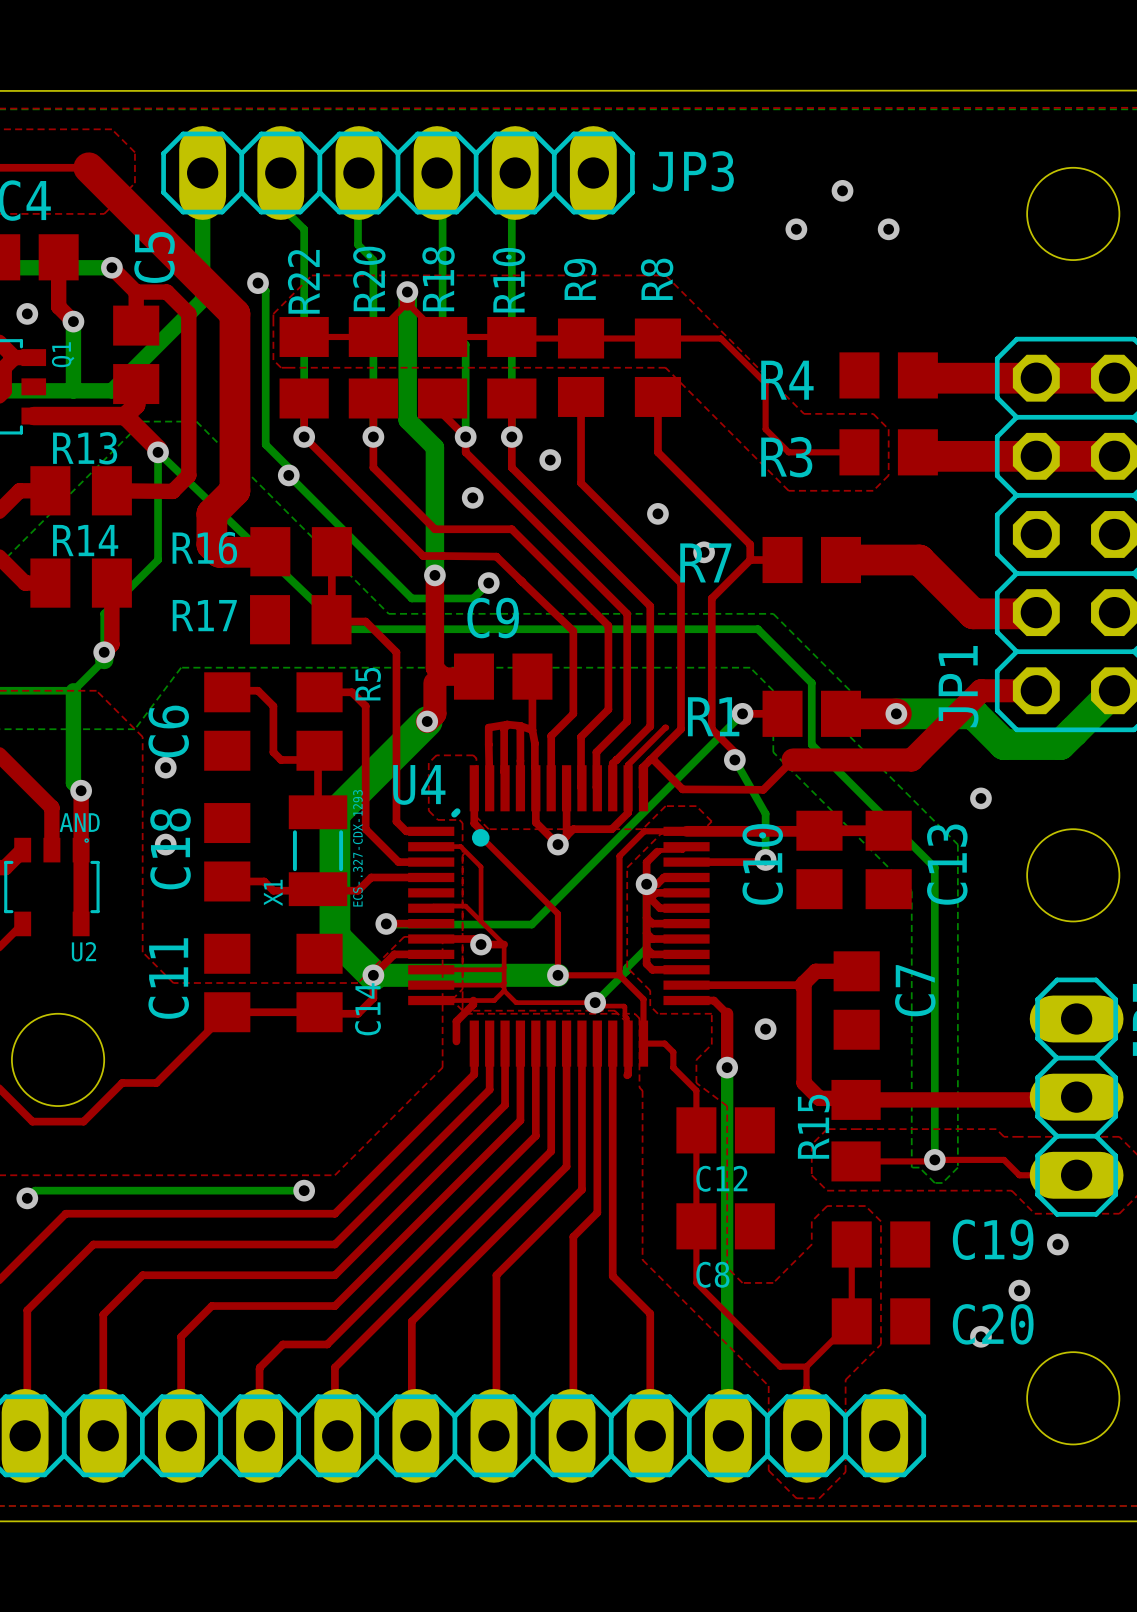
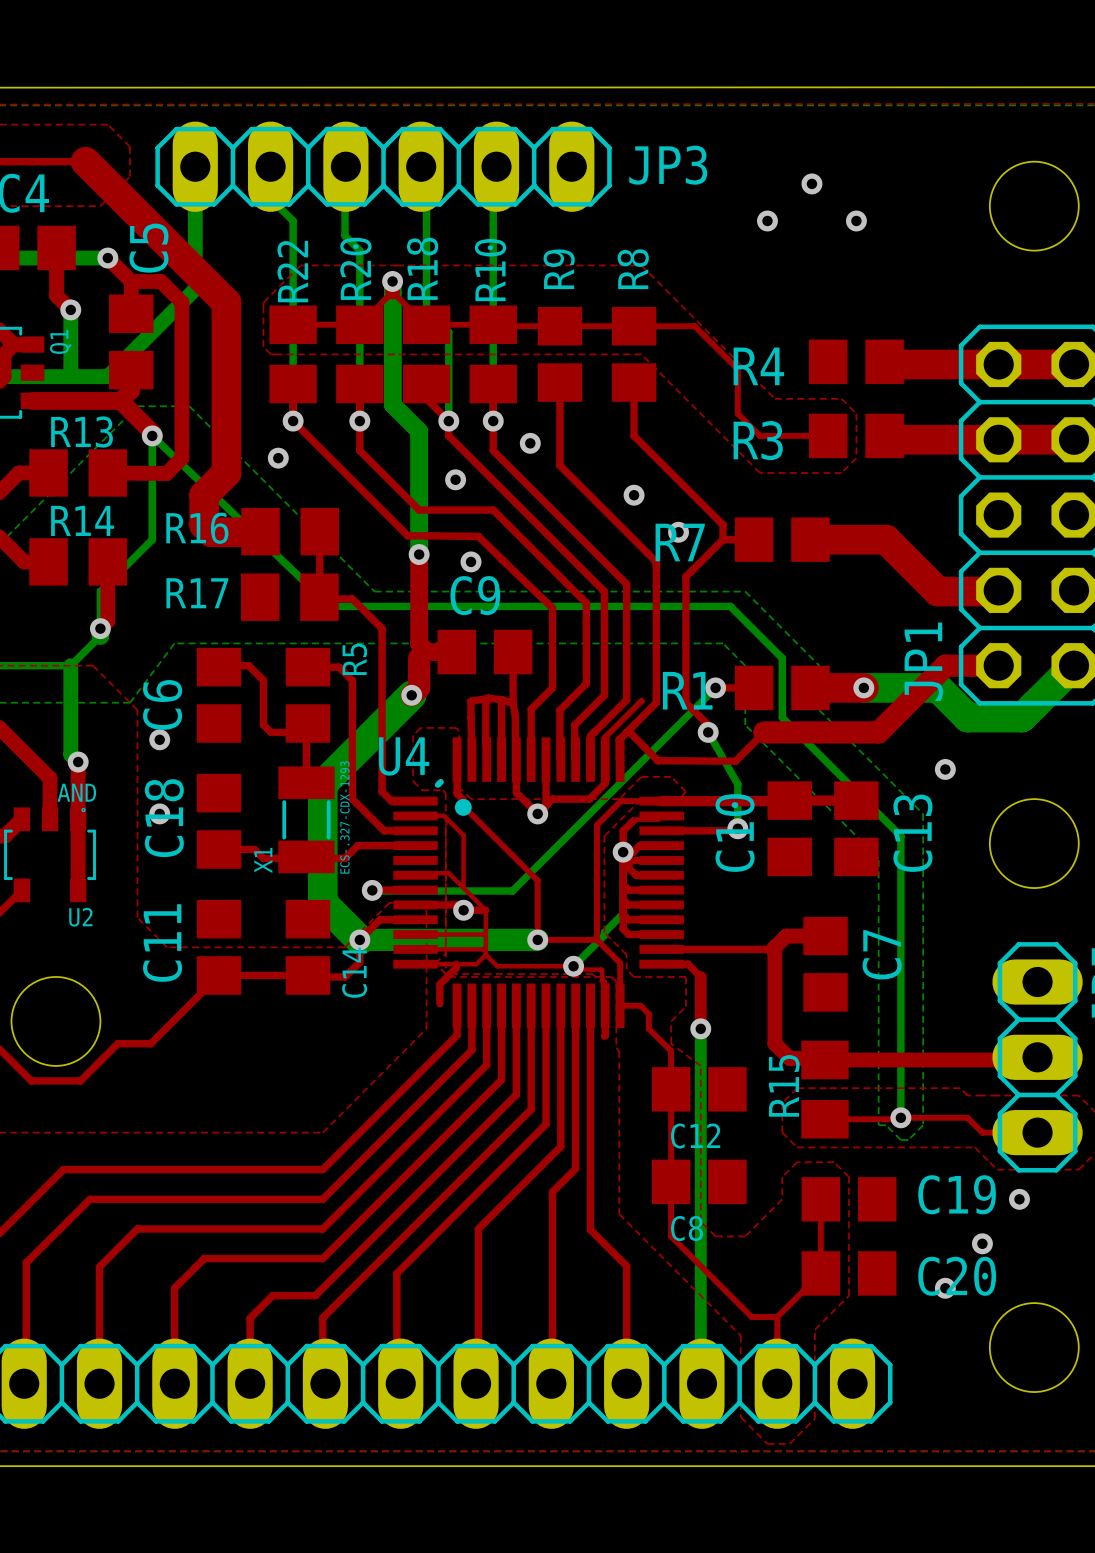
bottom track: (258, 283) (265, 290) (265, 444) (288, 467) (288, 475) (411, 598) (473, 598) (488, 583) -> none
via: (258, 283) -> none
via: (27, 313) -> none
via: (765, 1029) -> none
bottom track: (304, 1190) (34, 1190) (27, 1198) -> none
via: (304, 1190) -> none
via: (27, 1198) -> none

